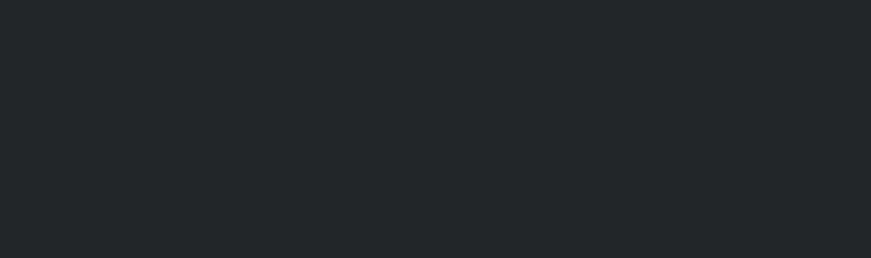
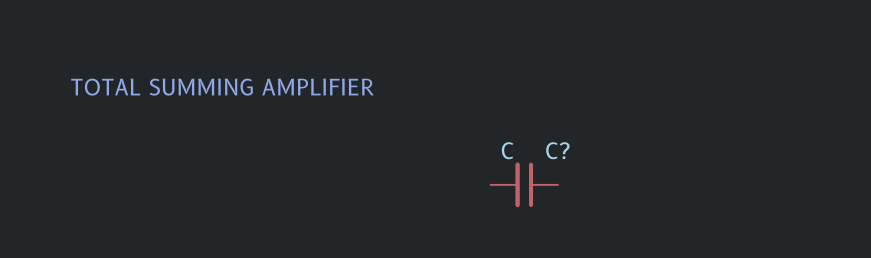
text: none -> TOTAL SUMMING AMPLIFIER (222, 87)
C?: none -> C (524, 184)

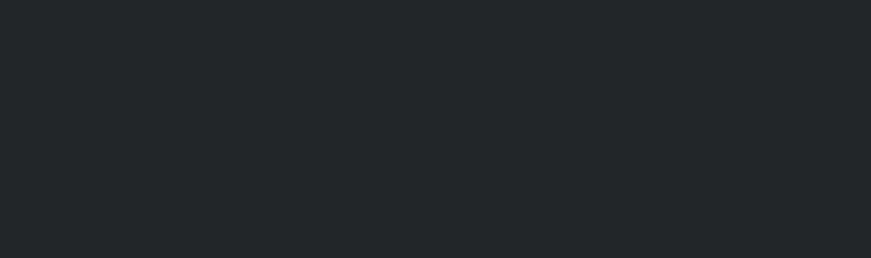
text: TOTAL SUMMING AMPLIFIER (222, 87) -> none
C?: C (524, 184) -> none

